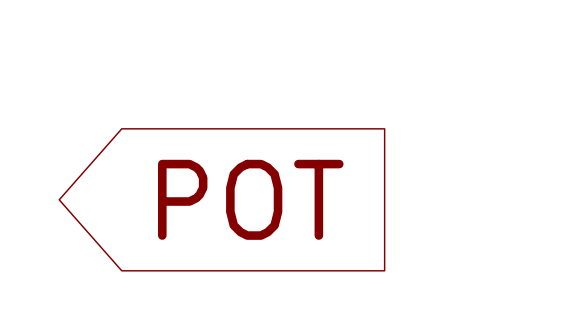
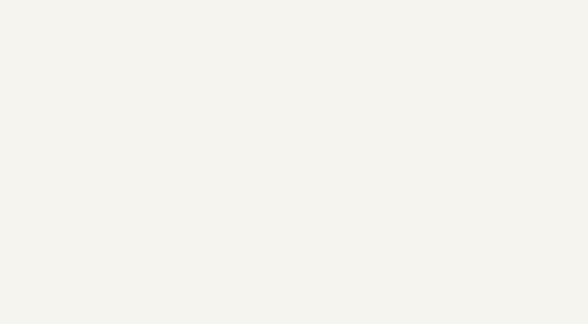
global label: POT (250, 199) -> none

